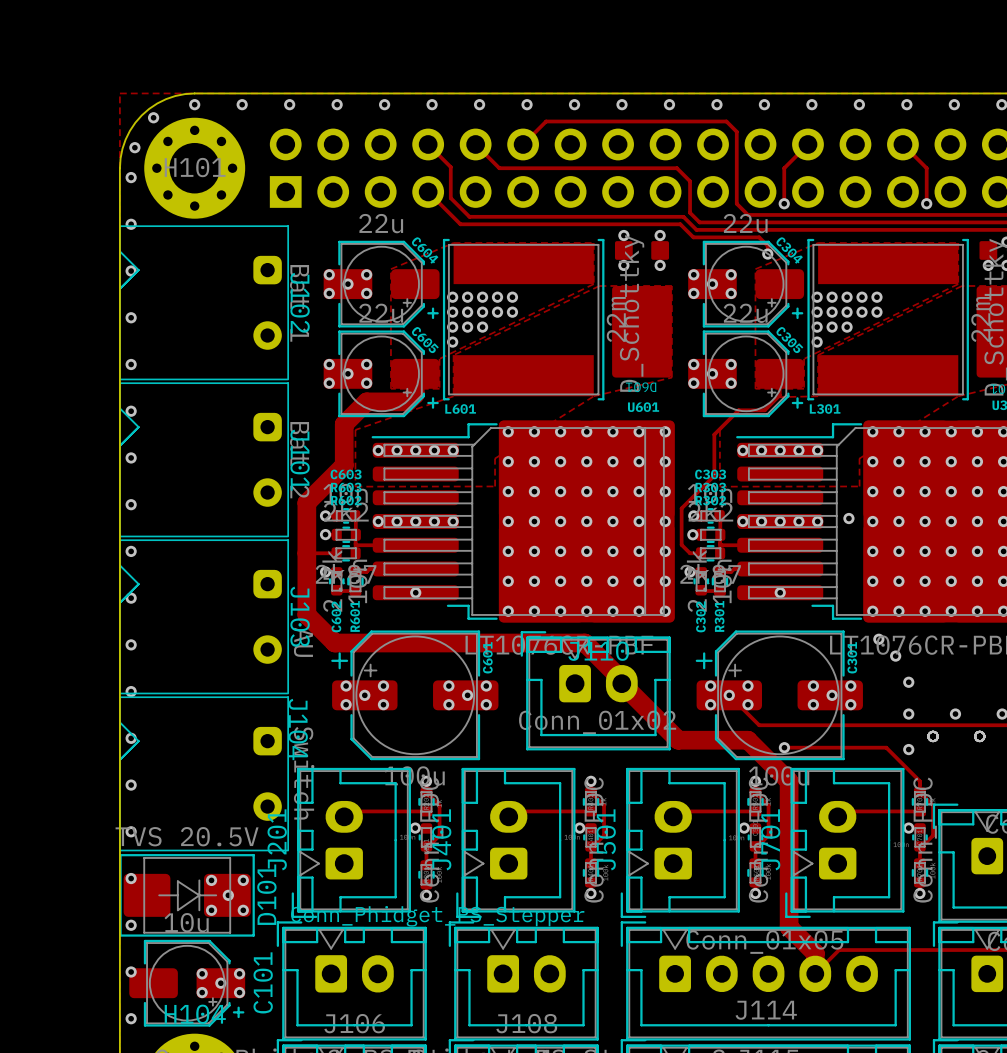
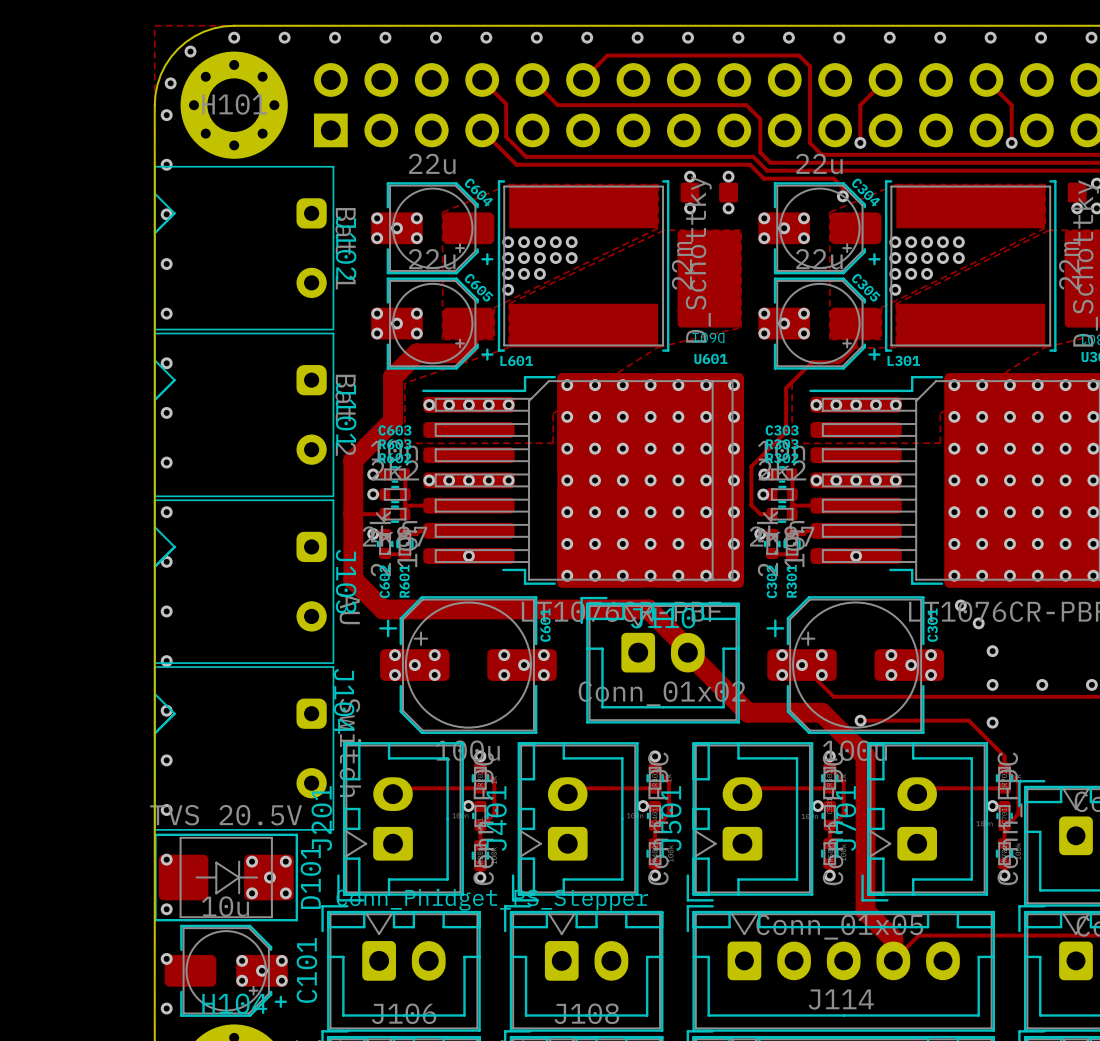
via: (848, 518) -> none
via: (933, 736) -> none
via: (979, 736) -> none

